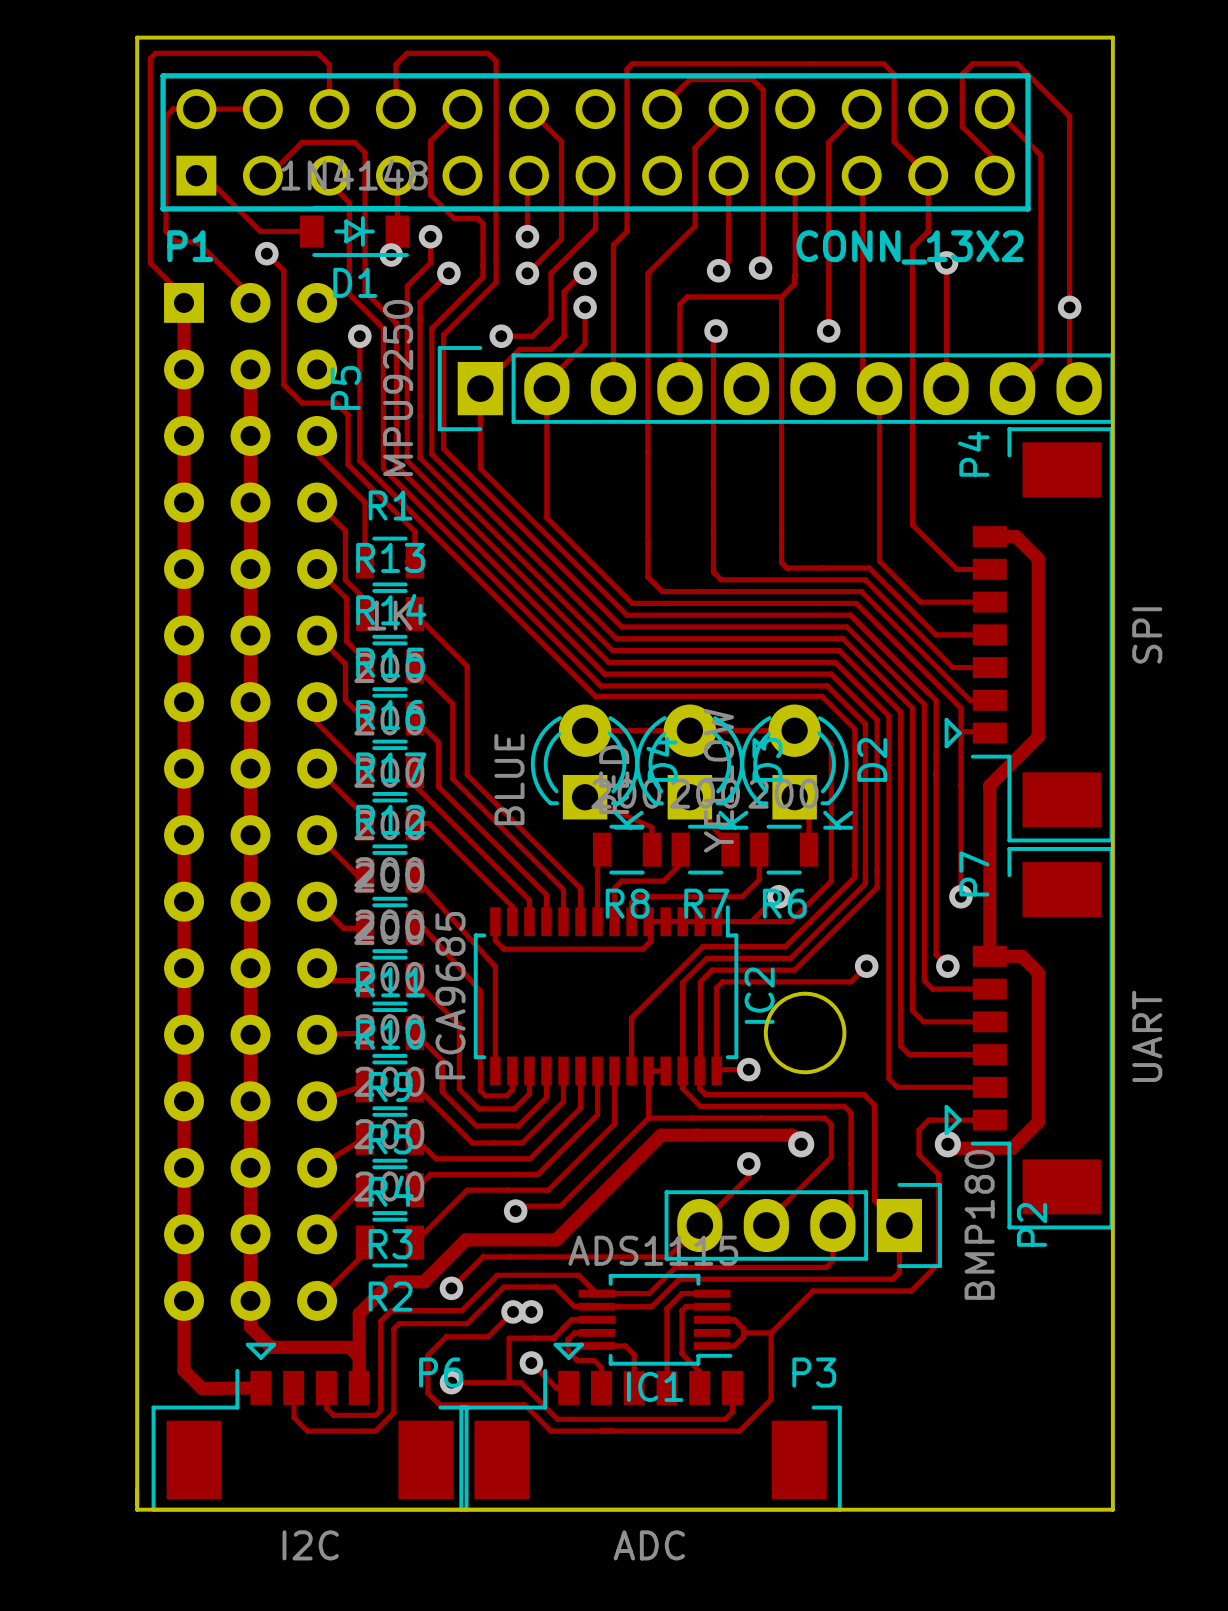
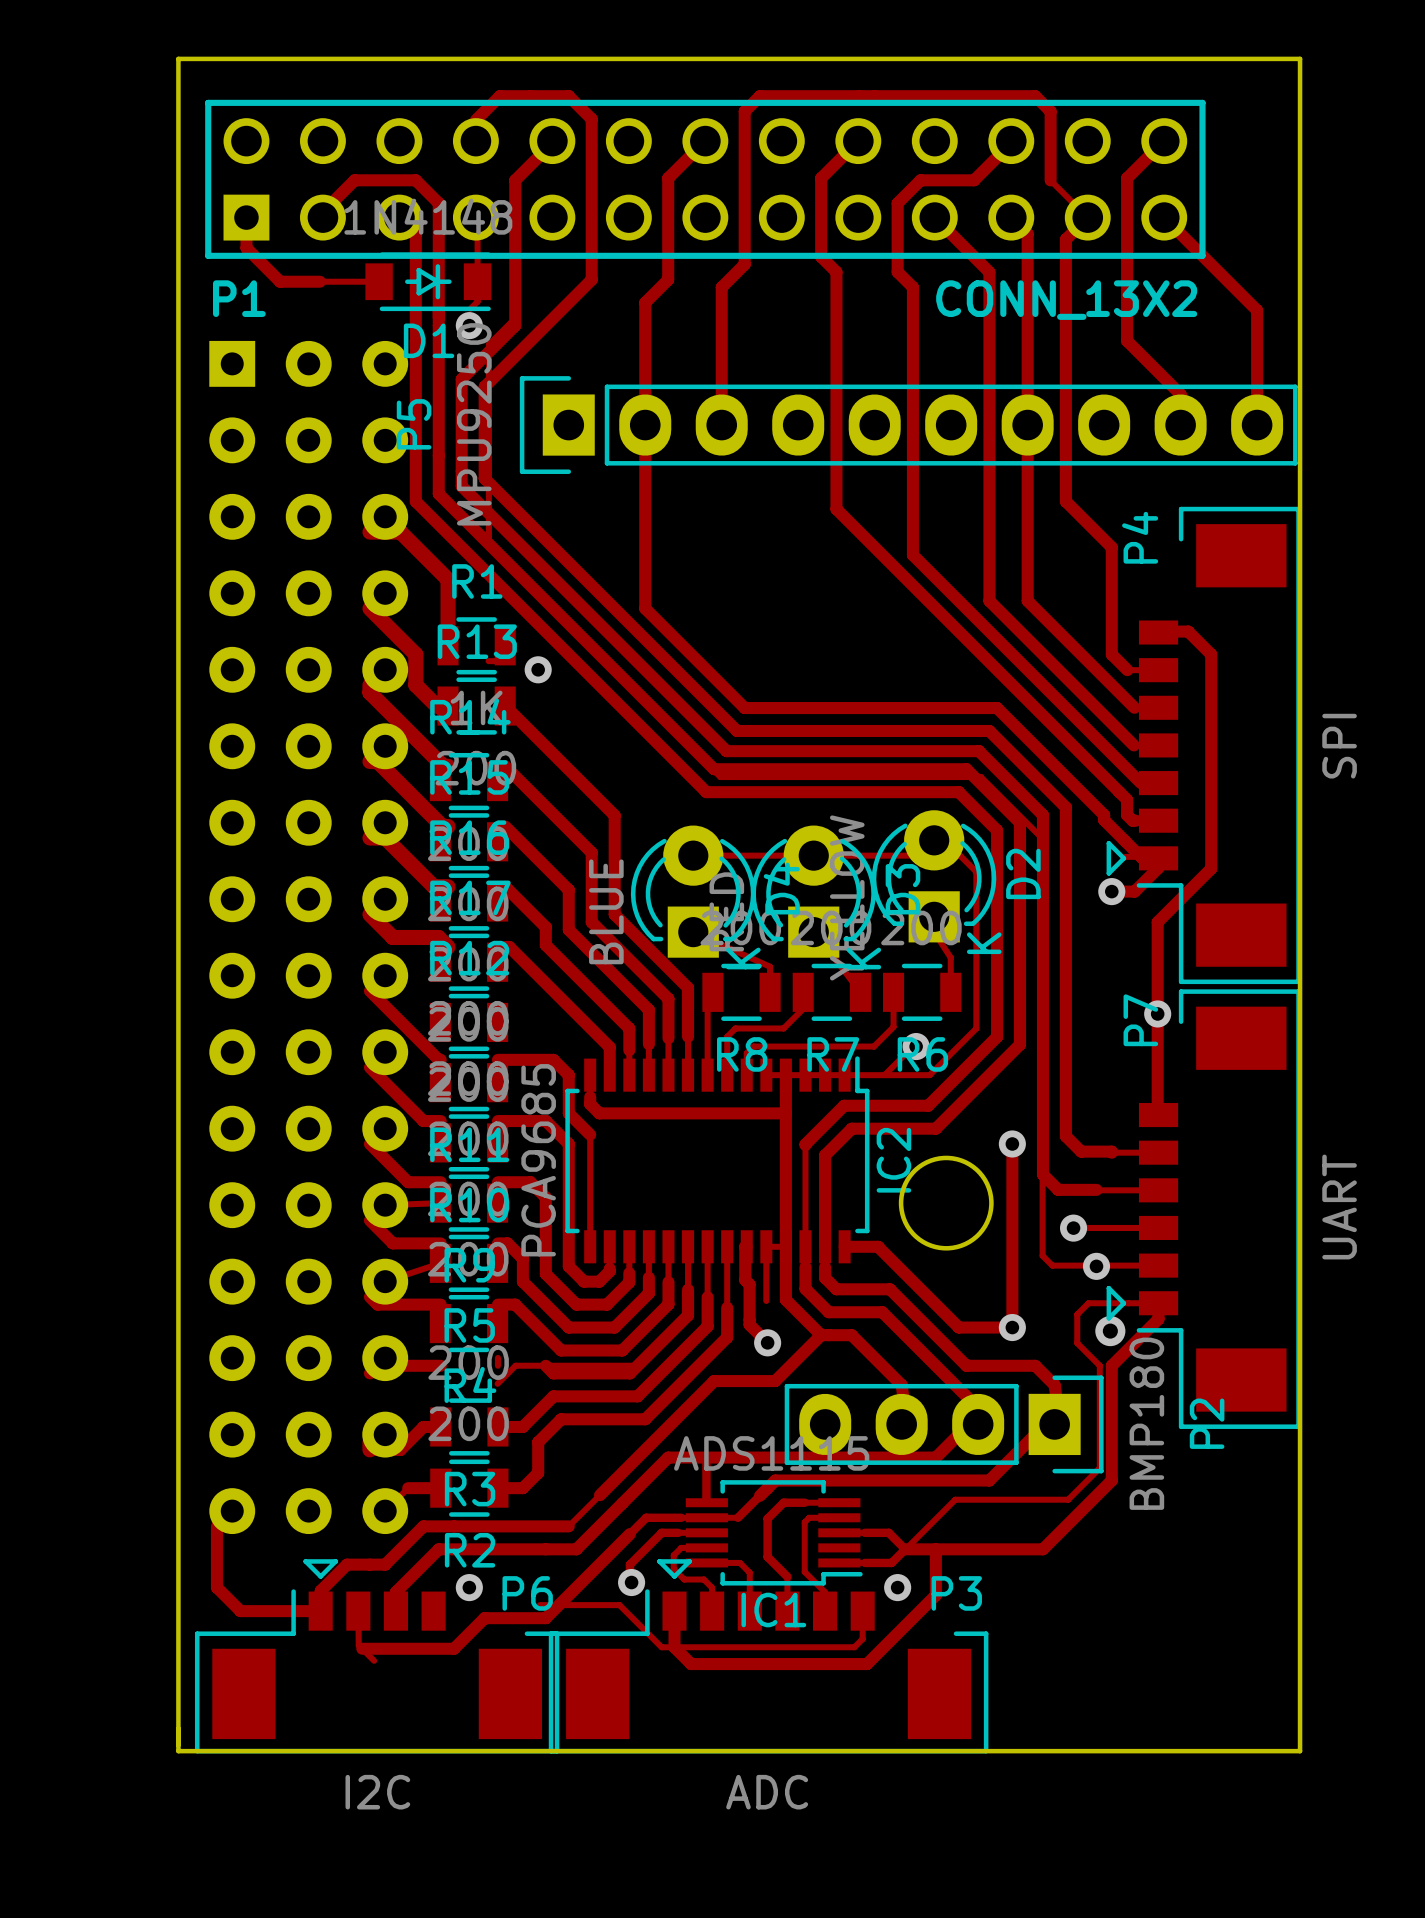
track: (395, 90) (395, 64) (406, 53) (488, 53) (496, 61) (496, 282) (443, 334) (443, 448) (621, 626) (847, 626) (924, 704) (924, 980) (932, 989) (949, 989) -> (475, 120) (499, 96) (568, 96) (591, 119) (591, 279) (484, 386) (484, 478) (737, 730) (989, 730) (1065, 807) (1065, 1136) (1081, 1151) (1111, 1152)
track: (662, 96) (662, 107) (689, 79) (752, 79) (763, 89) (763, 273) (765, 262) (760, 268) -> none
track: (262, 109) (173, 109) (165, 116) (165, 231) (176, 241) (197, 241) (250, 295) (250, 302) -> none
track: (329, 109) (329, 64) (317, 53) (155, 53) (150, 58) (150, 262) (184, 296) (184, 1370) (201, 1388) (260, 1387) -> none
track: (478, 109) (462, 109) (430, 141) (430, 194) (454, 218) (477, 218) (482, 223) (482, 277) (431, 328) (431, 454) (616, 638) (843, 638) (912, 708) (912, 1010) (923, 1021) (935, 1021) -> (552, 141) (515, 180) (515, 325) (461, 379) (461, 486) (726, 751) (979, 751) (1042, 815) (1042, 1174) (1058, 1189) (1096, 1189)
track: (529, 109) (561, 141) (561, 239) (527, 273) -> none
track: none -> (705, 141) (668, 178) (668, 279) (645, 302) (645, 608) (744, 708) (997, 708) (1104, 815) (1104, 820) (1142, 858) (1158, 858) (1158, 867) (1134, 891) (1111, 891)
track: (861, 109) (828, 142) (828, 330) -> none
track: (994, 109) (1040, 155) (1040, 360) (1012, 388) -> (1164, 141) (1127, 178) (1127, 340) (1180, 394) (1180, 425)
track: (728, 114) (695, 147) (695, 226) (647, 273) (647, 577) (662, 591) (861, 591) (970, 700) -> (858, 141) (821, 178) (821, 256) (836, 272) (836, 509) (1127, 799) (1127, 815) (1132, 820) (1135, 820)
track: (895, 143) (894, 141) (894, 74) (883, 63) (632, 63) (626, 69) (626, 231) (613, 245) (613, 388) -> (1050, 180) (1050, 111) (1035, 96) (759, 96) (744, 111) (744, 264) (721, 287) (721, 425)
track: (994, 159) (962, 126) (962, 74) (972, 63) (1017, 63) (1069, 116) (1069, 379) (1080, 387) -> none
track: (928, 165) (928, 231) (912, 247) (912, 524) (957, 569) (962, 569) -> (1087, 217) (1065, 239) (1065, 501) (1111, 547) (1111, 654) (1127, 670)
track: (329, 167) (329, 182) (349, 202) (349, 294) (383, 328) (383, 468) (600, 685) (827, 685) (865, 723) (865, 883) (790, 958) (706, 958) (682, 982) -> (399, 217) (415, 233) (415, 501) (706, 792) (958, 792) (997, 830) (997, 1036) (928, 1105) (844, 1105) (805, 1145)
track: (196, 175) (204, 175) (260, 231) -> (246, 217) (246, 248) (280, 281) (319, 281)
track: (263, 175) (268, 175) (302, 142) (354, 142) (365, 152) (365, 291) (396, 323) (396, 465) (604, 674) (831, 674) (877, 719) (877, 887) (794, 970) (712, 970) (700, 981) (700, 1070) -> (322, 217) (322, 211) (354, 180) (415, 180) (438, 203) (438, 493) (714, 769) (966, 769) (1020, 822) (1020, 1044) (935, 1128) (851, 1128) (825, 1155) (825, 1246)
track: (595, 175) (595, 228) (551, 273) (551, 317) (532, 336) (501, 336) -> none
track: (795, 175) (795, 275) -> none
track: none -> (1164, 217) (1257, 310) (1257, 425)
track: (862, 176) (862, 371) (879, 388) (879, 561) (920, 602) (968, 602) -> (1011, 217) (1027, 233) (1027, 600) (1134, 707)
track: (527, 177) (527, 236) -> none
track: (728, 190) (728, 260) (718, 270) -> none
via: (430, 236) -> none
via: (527, 236) -> none
track: (266, 253) (283, 270) (283, 384) (302, 403) (336, 403) (348, 414) (348, 464) (414, 531) (414, 561) -> none
via: (266, 253) -> none
via position: (391, 255) -> (469, 325)
track: (946, 262) (946, 368) -> none
via: (946, 262) -> none
via: (760, 268) -> none
via: (718, 270) -> none
track: (448, 273) (420, 302) (420, 458) (612, 650) (839, 650) (900, 712) (900, 1046) (909, 1054) (915, 1054) -> none
via: (448, 273) -> none
via: (527, 273) -> none
track: (585, 273) (582, 273) (564, 291) (564, 336) (551, 349) (519, 349) (480, 388) -> none
via: (585, 273) -> none
track: (794, 275) (794, 283) (781, 296) -> none
track: (781, 296) (781, 562) (786, 568) (869, 568) (936, 634) (968, 634) -> (934, 217) (989, 272) (989, 600) (1133, 745)
track: (781, 296) (687, 296) (679, 304) (679, 388) -> none
track: (585, 307) (585, 344) (546, 382) (546, 518) (632, 603) (856, 603) (960, 708) (960, 896) -> none
via: (585, 307) -> none
via: (1069, 307) -> none
track: (716, 330) (713, 333) (713, 571) (721, 579) (865, 579) (953, 667) (974, 667) -> (1011, 141) (974, 180) (920, 180) (897, 203) (897, 272) (912, 287) (912, 555) (1140, 783)
via: (716, 330) -> none
via: (828, 330) -> none
track: (359, 336) (359, 460) (595, 696) (822, 696) (854, 729) (854, 877) (785, 946) (702, 946) (631, 1017) (631, 1070) -> (767, 1342) (749, 1324) (749, 1284) (745, 1280) (745, 1246) (746, 1246)
via: (359, 336) -> none
via: (501, 336) -> none
track: (250, 369) (250, 1327) (270, 1347) (349, 1347) (359, 1357) (359, 1387) (359, 1313) (391, 1281) (423, 1281) (465, 1239) (556, 1239) (661, 1135) (792, 1135) (801, 1144) -> none
track: (480, 388) (480, 468) (626, 615) (850, 615) (936, 700) (936, 954) (947, 966) -> none
P5 position: (776, 388) -> (908, 425)
track: (318, 434) (317, 454) (365, 502) (365, 561) -> none
track: none -> (369, 532) (400, 532) (448, 579) (448, 645)
track: (317, 502) (345, 530) (345, 579) (365, 599) -> none
track: none -> (369, 608) (415, 654) (415, 685) (436, 706) (448, 706)
track: (989, 536) (1015, 536) (1038, 558) (1038, 736) (989, 785) (989, 956) (1021, 956) (1038, 972) (1038, 1122) (1012, 1148) (951, 1148) (947, 1144) -> (1158, 632) (1188, 631) (1211, 654) (1211, 868) (1157, 922) (1158, 1115)
R1 position: (389, 561) -> (476, 645)
track: (317, 569) (346, 598) (346, 641) (365, 659) -> none
via: none -> (538, 669)
track: none -> (369, 685) (369, 692) (443, 766) (448, 766)
R13 position: (389, 613) -> (476, 706)
track: (414, 613) (467, 666) (467, 774) (580, 888) -> (505, 706) (614, 815) (614, 914) (688, 987) (688, 1036)
track: (317, 635) (345, 663) (345, 700) (363, 718) -> none
track: none -> (369, 761) (377, 761) (442, 826) (448, 826)
track: (414, 666) (452, 704) (452, 778) (563, 889) -> (505, 766) (591, 852) (591, 922) (668, 998) (668, 1038)
track: (317, 702) (317, 723) (365, 771) -> none
track: none -> (369, 838) (385, 838) (433, 886) (448, 886)
track: (414, 718) (438, 742) (438, 786) (546, 894) -> (505, 826) (568, 890) (568, 929) (648, 1009) (648, 1044)
via: none -> (1111, 891)
D2 position: (794, 762) -> (934, 876)
track: (317, 768) (365, 816) -> none
track: (418, 771) (414, 771) (414, 785) (529, 900) -> (505, 886) (545, 927) (545, 945) (629, 1028) (629, 1050)
track: none -> (369, 914) (392, 937) (438, 937) (448, 946)
track: (414, 823) (429, 823) (512, 906) -> (505, 946) (509, 946) (609, 1047) (609, 1057)
track: (317, 835) (357, 875) (365, 875) -> none
track: none -> (369, 991) (440, 1059)
track: (414, 875) (495, 966) (495, 973) -> (497, 1059) (553, 1059) (568, 1075) (568, 1113) (590, 1134)
via position: (960, 896) -> (1157, 1013)
track: (317, 901) (343, 928) (365, 928) -> none
track: none -> (369, 1067) (423, 1121) (440, 1121)
track: none -> (785, 1075) (785, 1299) (821, 1335)
track: (650, 923) (650, 941) (642, 949) (503, 949) (495, 940) -> (785, 1113) (599, 1113) (590, 1104) (590, 1096)
track: (414, 937) (414, 928) (423, 928) (480, 991) (480, 1090) (485, 1095) (506, 1095) (512, 1089) -> (497, 1131) (497, 1121) (545, 1121) (568, 1143) (568, 1266) (584, 1281) (599, 1281) (609, 1271) (609, 1268)
track: (866, 966) (850, 981) (722, 981) (716, 987) (716, 1070) -> (1012, 1143) (1012, 1327) (958, 1327) (878, 1246) (844, 1246)
via position: (866, 966) -> (1012, 1143)
via: (947, 966) -> none
track: (317, 968) (329, 980) (365, 980) -> none
track: (414, 980) (459, 1025) (459, 1089) (479, 1108) (514, 1108) (529, 1093) -> (497, 1182) (530, 1182) (545, 1197) (545, 1274) (576, 1304) (607, 1304) (629, 1282) (629, 1273)
track: none -> (369, 1143) (408, 1182) (440, 1182)
track: (414, 1032) (442, 1060) (442, 1091) (476, 1125) (518, 1125) (546, 1097) -> (497, 1243) (507, 1243) (522, 1258) (522, 1281) (568, 1327) (614, 1327) (648, 1293) (648, 1277)
track: none -> (369, 1220) (392, 1243) (440, 1243)
via: none -> (1073, 1228)
via: (748, 1069) -> none
track: (414, 1085) (472, 1142) (522, 1142) (563, 1101) -> (500, 1304) (497, 1304) (515, 1304) (561, 1350) (622, 1350) (668, 1304) (668, 1282)
via: none -> (1096, 1266)
track: (682, 1088) (700, 1106) (844, 1106) (850, 1112) (850, 1207) (832, 1225) (832, 1260) (826, 1267) (675, 1267) (649, 1293) (596, 1293) (578, 1275) (497, 1275) (461, 1310) (391, 1310) (380, 1321) (380, 1410) (375, 1415) (333, 1415) (326, 1408) (326, 1387) -> (981, 1411) (935, 1457) (668, 1457) (576, 1549) (438, 1549) (395, 1592) (395, 1611)
track: none -> (805, 1267) (805, 1288) (828, 1312) (882, 1312) (981, 1411)
track: (699, 1088) (705, 1094) (864, 1094) (874, 1105) (874, 1200) (899, 1225) (899, 1272) (892, 1279) (679, 1279) (651, 1306) (623, 1306) -> (825, 1267) (825, 1277) (836, 1289) (889, 1289) (966, 1365) (1035, 1365) (1054, 1385) (1058, 1411) (989, 1480) (775, 1480) (759, 1495)
track: (580, 1108) (530, 1158) (435, 1158) (414, 1137) (414, 1130) -> (688, 1289) (688, 1315) (629, 1373) (553, 1373) (545, 1365)
track: none -> (369, 1296) (377, 1304) (440, 1304)
track: (597, 1114) (537, 1174) -> (707, 1297) (707, 1326) (637, 1396) (553, 1396) (522, 1426) (497, 1426)
track: none -> (1158, 1303) (1158, 1319) (1111, 1365) (1111, 1480) (1042, 1549) (905, 1549)
track: (614, 1124) (548, 1190) (467, 1190) (414, 1242) (416, 1242) -> (727, 1307) (727, 1337) (645, 1419) (561, 1419) (538, 1442) (538, 1472) (522, 1488) (497, 1488) (499, 1488)
track: (365, 1137) (317, 1167) -> none
via: none -> (1012, 1327)
via: (801, 1144) -> none
track: none -> (821, 1335) (851, 1335) (901, 1385) (905, 1411) (905, 1408)
via: none -> (767, 1342)
track: (748, 1163) (748, 1176) (668, 1256) (482, 1256) (451, 1288) -> none
via: (748, 1163) -> none
track: none -> (497, 1357) (497, 1365)
track: none -> (440, 1365) (377, 1365) (369, 1373)
track: (365, 1190) (361, 1190) (317, 1234) -> none
R3 position: (389, 1190) -> (469, 1426)
track: (515, 1211) (520, 1206) (560, 1206) (648, 1118) (824, 1118) (831, 1124) (831, 1157) (766, 1222) (766, 1225) (774, 1216) -> none
via: (515, 1211) -> none
track: none -> (440, 1426) (423, 1426) (400, 1449) (369, 1449) (369, 1442)
track: (365, 1242) (365, 1252) (337, 1280) -> (440, 1488) (408, 1488)
R2 position: (389, 1242) -> (469, 1488)
track: none -> (706, 1457) (706, 1502)
track: none -> (767, 1488) (737, 1517)
track: (503, 1287) (554, 1287) (574, 1306) -> (599, 1495) (714, 1381) (775, 1381) (821, 1335)
via: (451, 1288) -> none
track: (682, 1293) (666, 1308) (666, 1358) -> (804, 1502) (783, 1502) (767, 1518) (767, 1556) (787, 1576)
track: none -> (681, 1517) (646, 1517) (545, 1618) (484, 1618) (454, 1648) (362, 1648)
via: (513, 1311) -> none
track: (531, 1311) (513, 1311) (488, 1336) (446, 1336) (427, 1355) (427, 1393) (439, 1404) (524, 1404) (551, 1431) (739, 1431) (771, 1399) (771, 1332) (743, 1332) -> none
via: (531, 1311) -> none
track: (476, 1314) (467, 1323) (399, 1323) (393, 1328) (393, 1412) (375, 1431) (307, 1431) -> (568, 1526) (423, 1526) (385, 1564) (346, 1564) (320, 1590) (320, 1611) (240, 1611) (216, 1587) (216, 1526)
track: (571, 1319) (553, 1338) (509, 1338) (509, 1382) -> (678, 1532) (661, 1532) (629, 1564) (629, 1587)
track: (734, 1319) (743, 1328) (743, 1336) (734, 1345) -> (864, 1532) (888, 1532) (905, 1549)
track: none -> (905, 1549) (891, 1562) (864, 1562)
track: none -> (935, 1549) (935, 1595) (867, 1664) (691, 1664) (674, 1647) (674, 1611)
track: (531, 1363) (556, 1387) (563, 1387) -> none
via: none -> (469, 1587)
via: none -> (897, 1587)
via: (451, 1382) -> none

